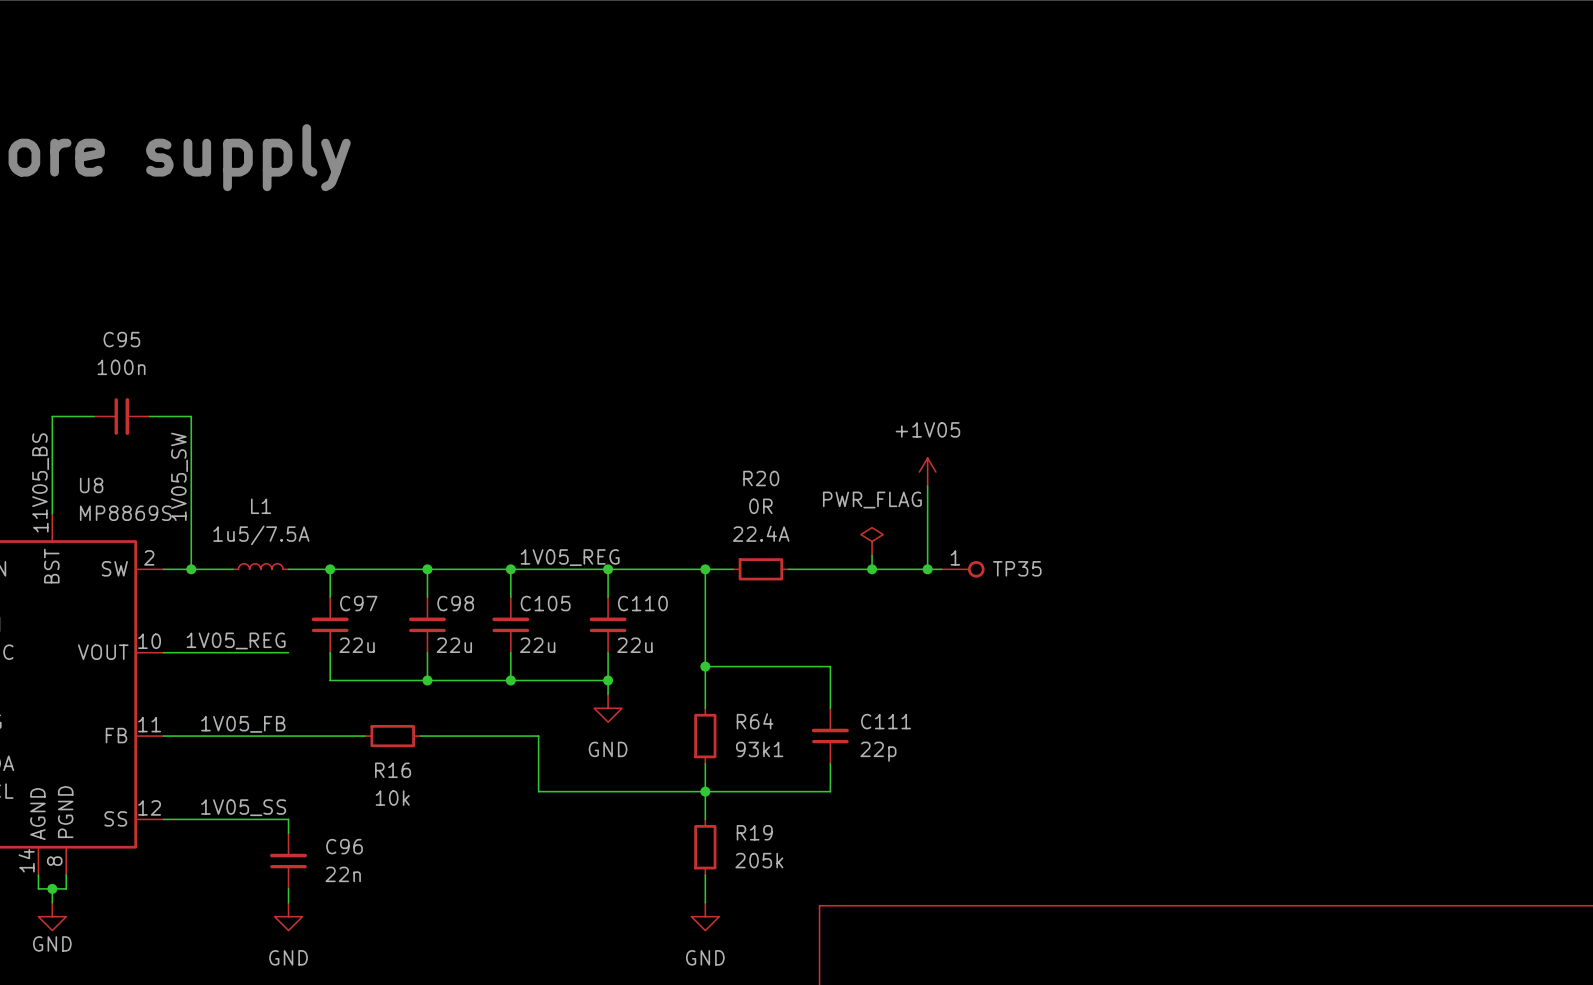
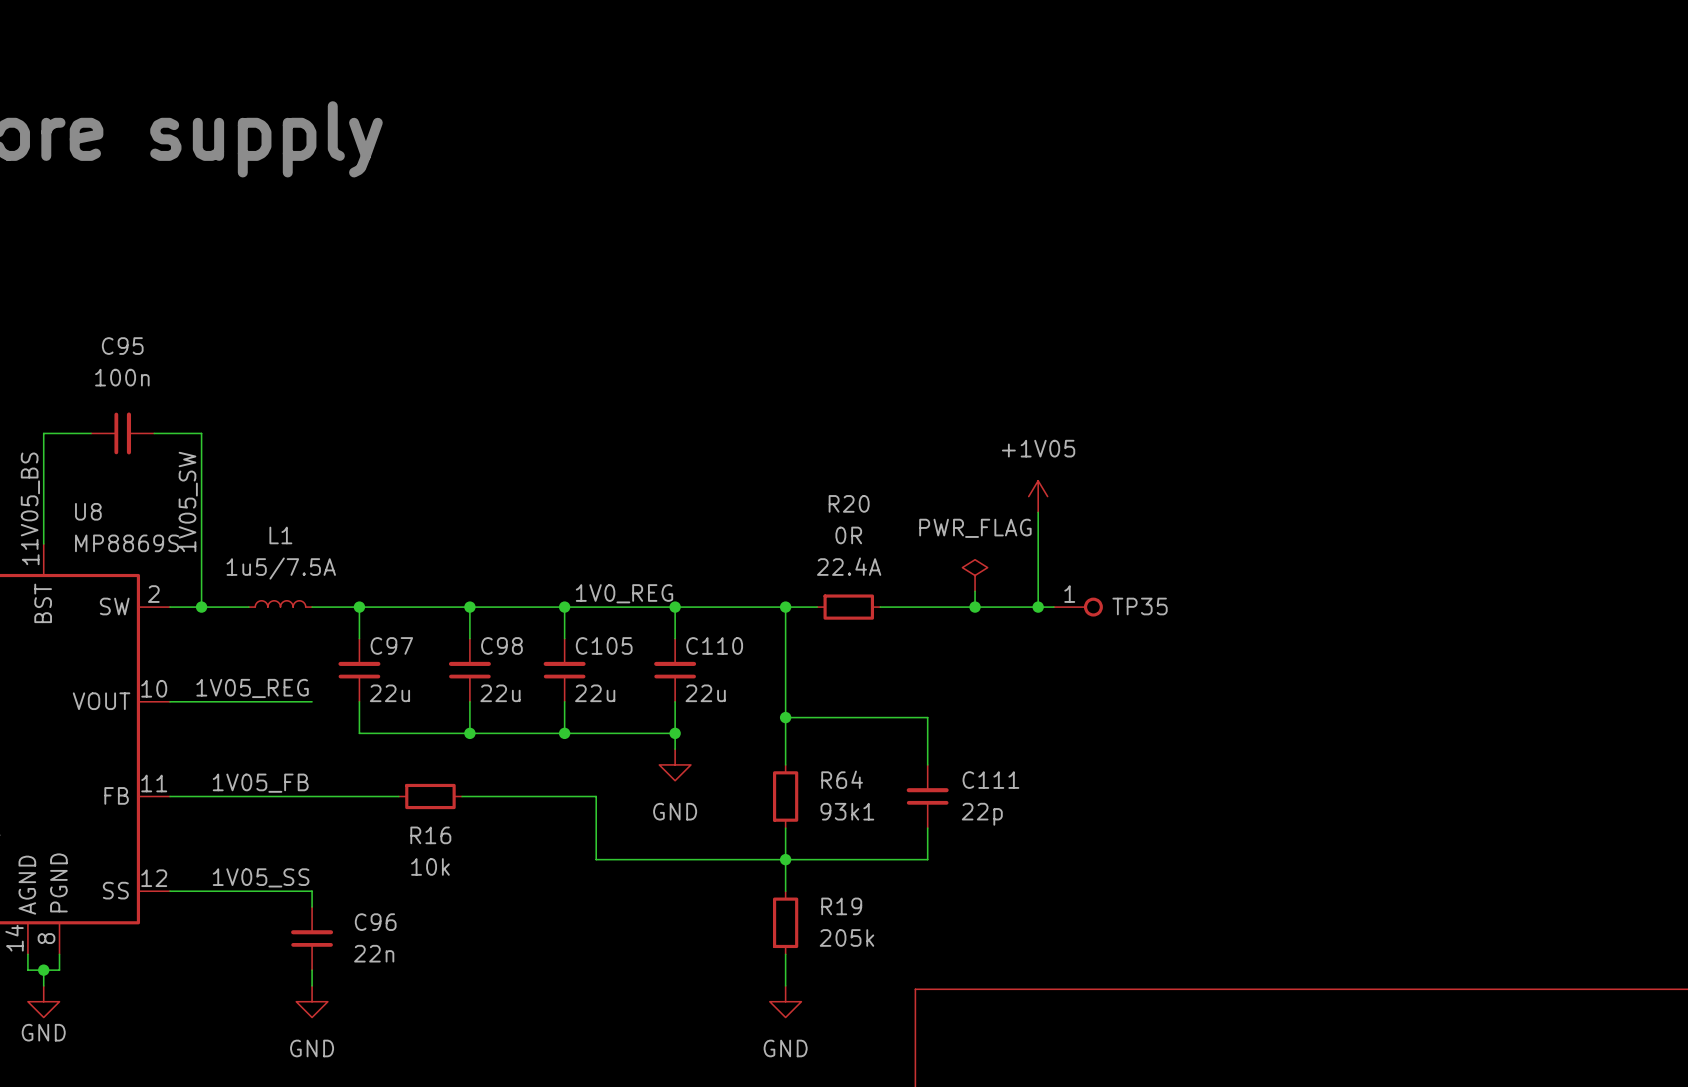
label: 1V05_REG (570, 557) -> 1V0_REG (624, 593)

